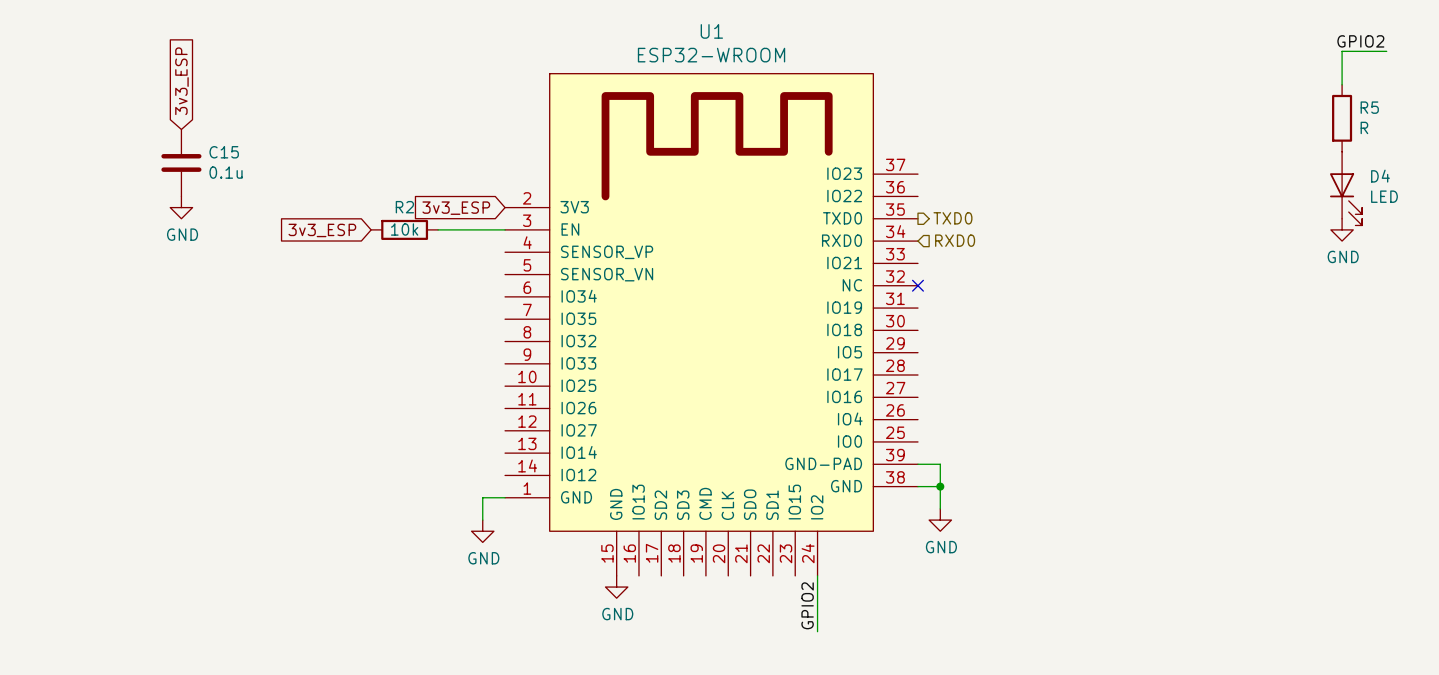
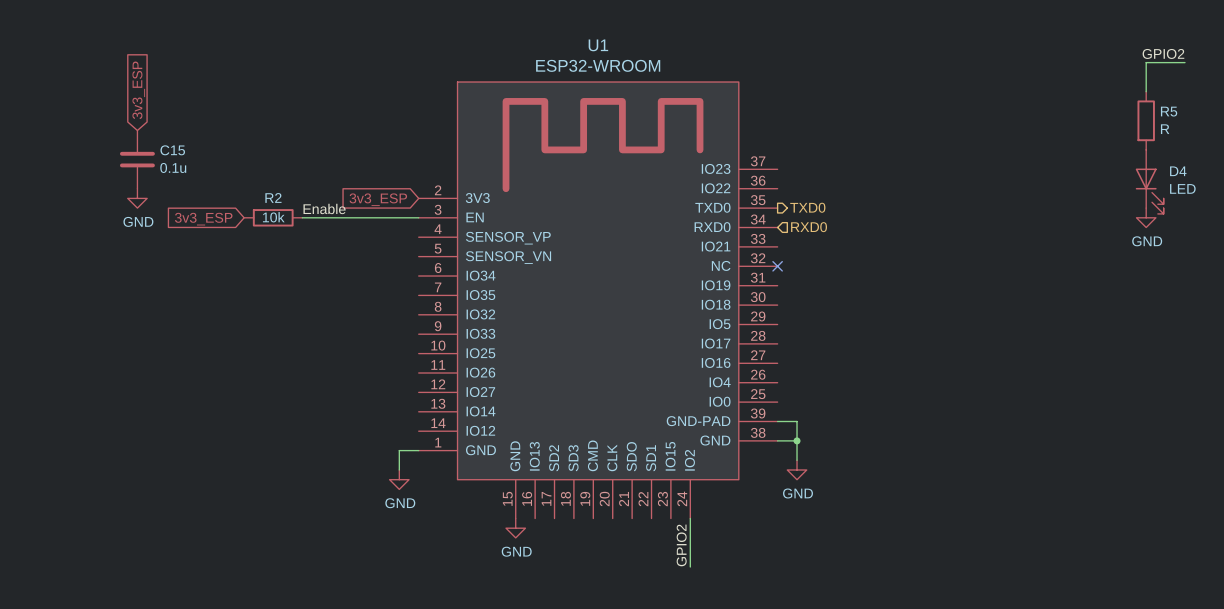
label: none -> Enable (324, 208)
wire: none -> (302, 217) (360, 217)
R2 position: (404, 229) -> (273, 217)
global label position: 3v3_ESP (322, 230) -> 3v3_ESP (203, 219)

